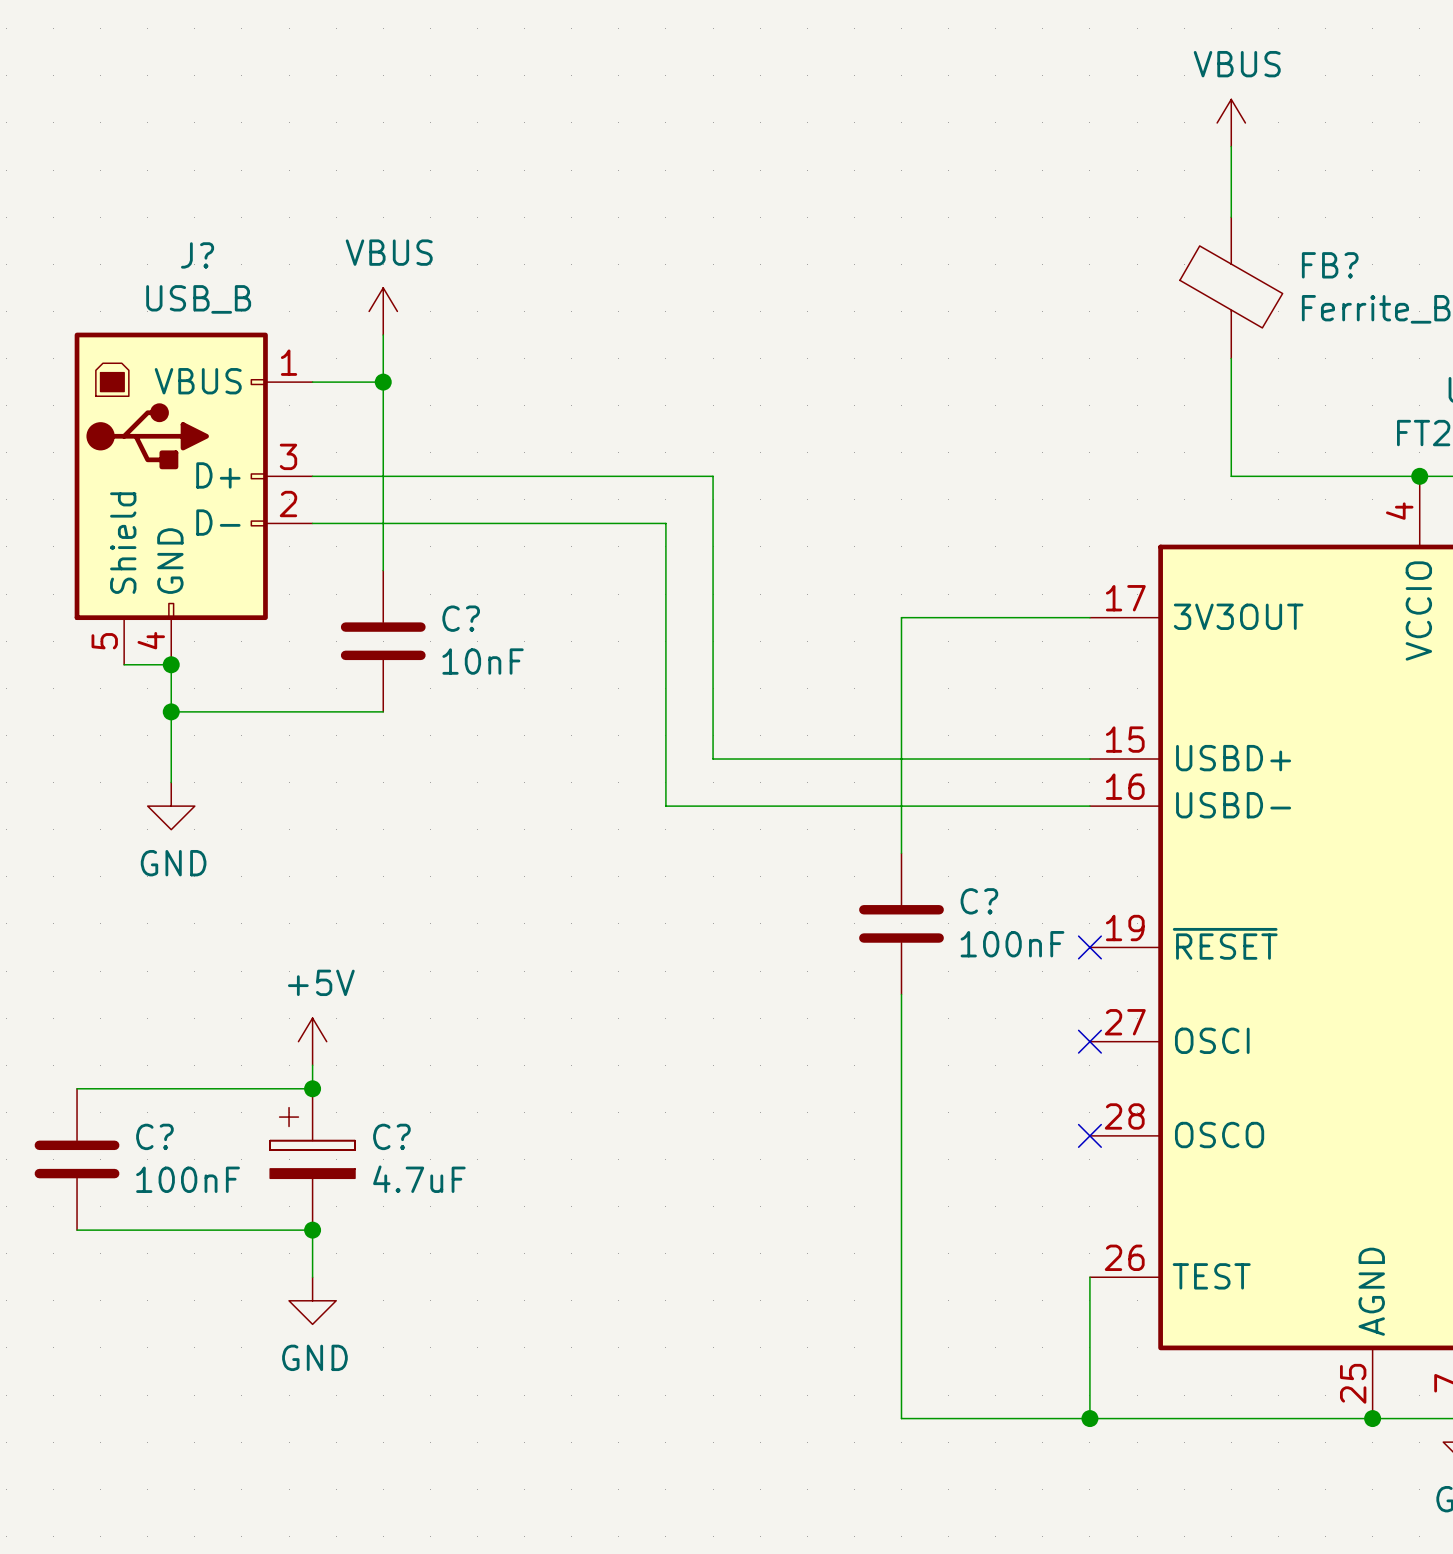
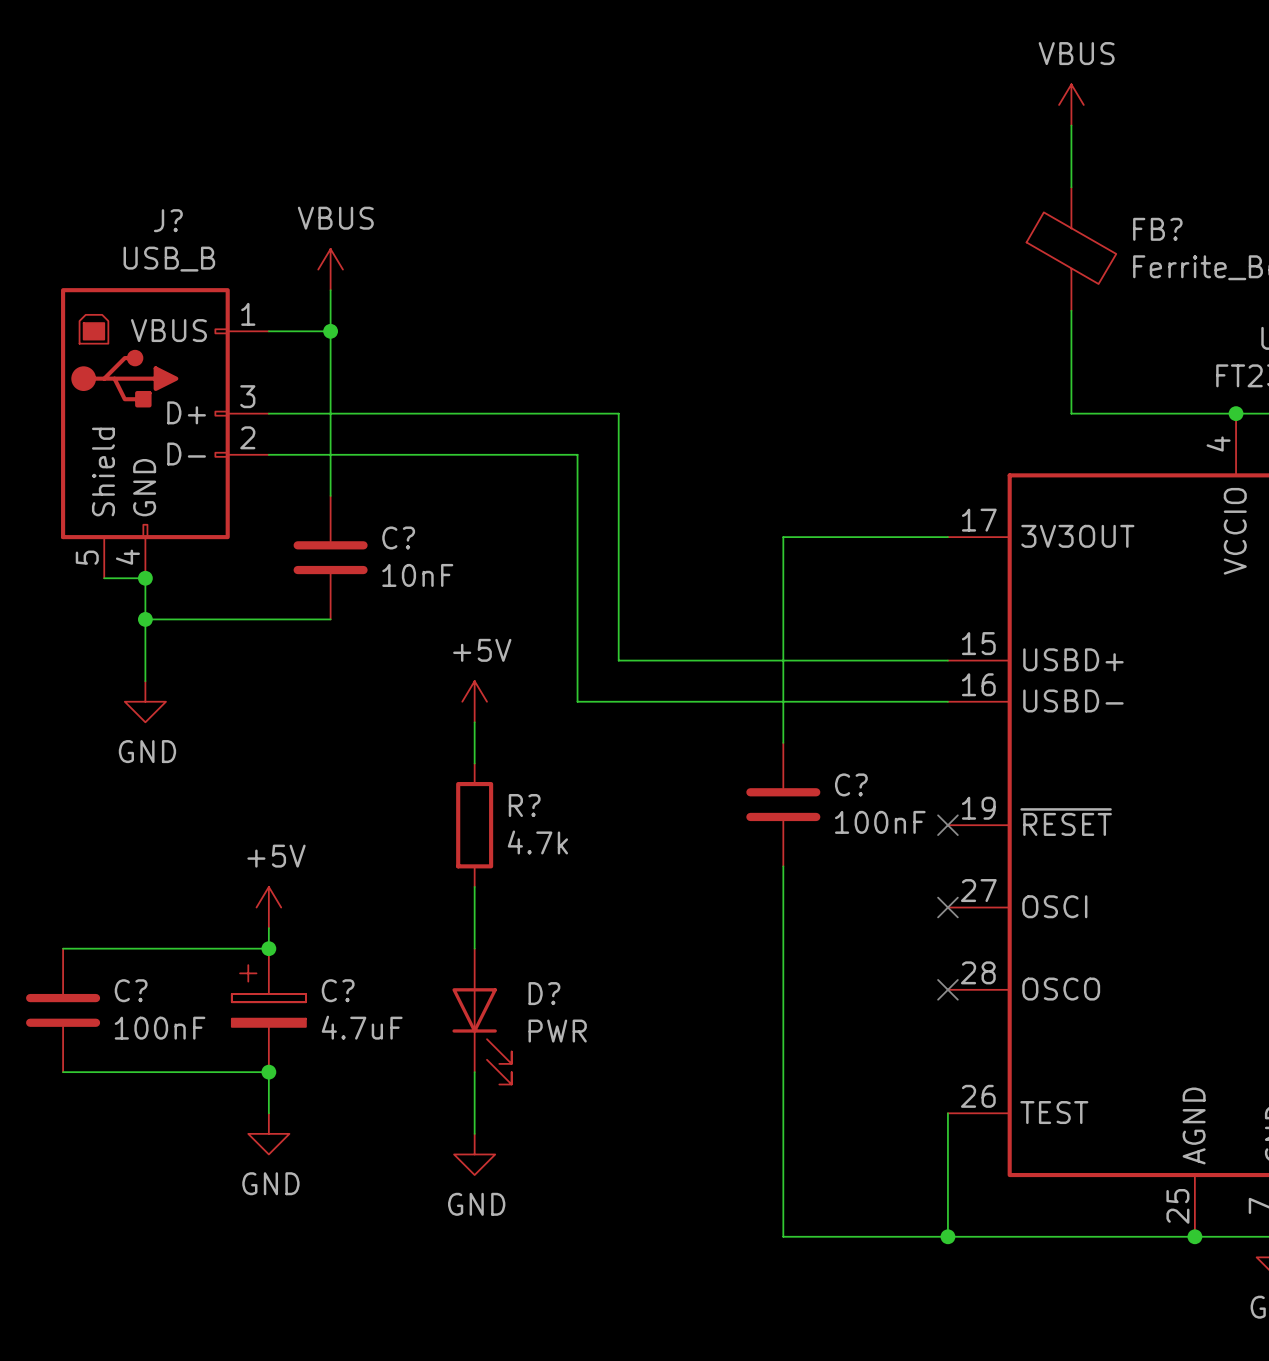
power symbol: none -> +5V (474, 701)
wire: none -> (474, 722) (474, 763)
R?: none -> 4.7k (474, 825)
wire: none -> (474, 886) (474, 948)
D?: none -> PWR (482, 1016)
wire: none -> (474, 1072) (474, 1133)
power symbol: none -> GND (474, 1154)

